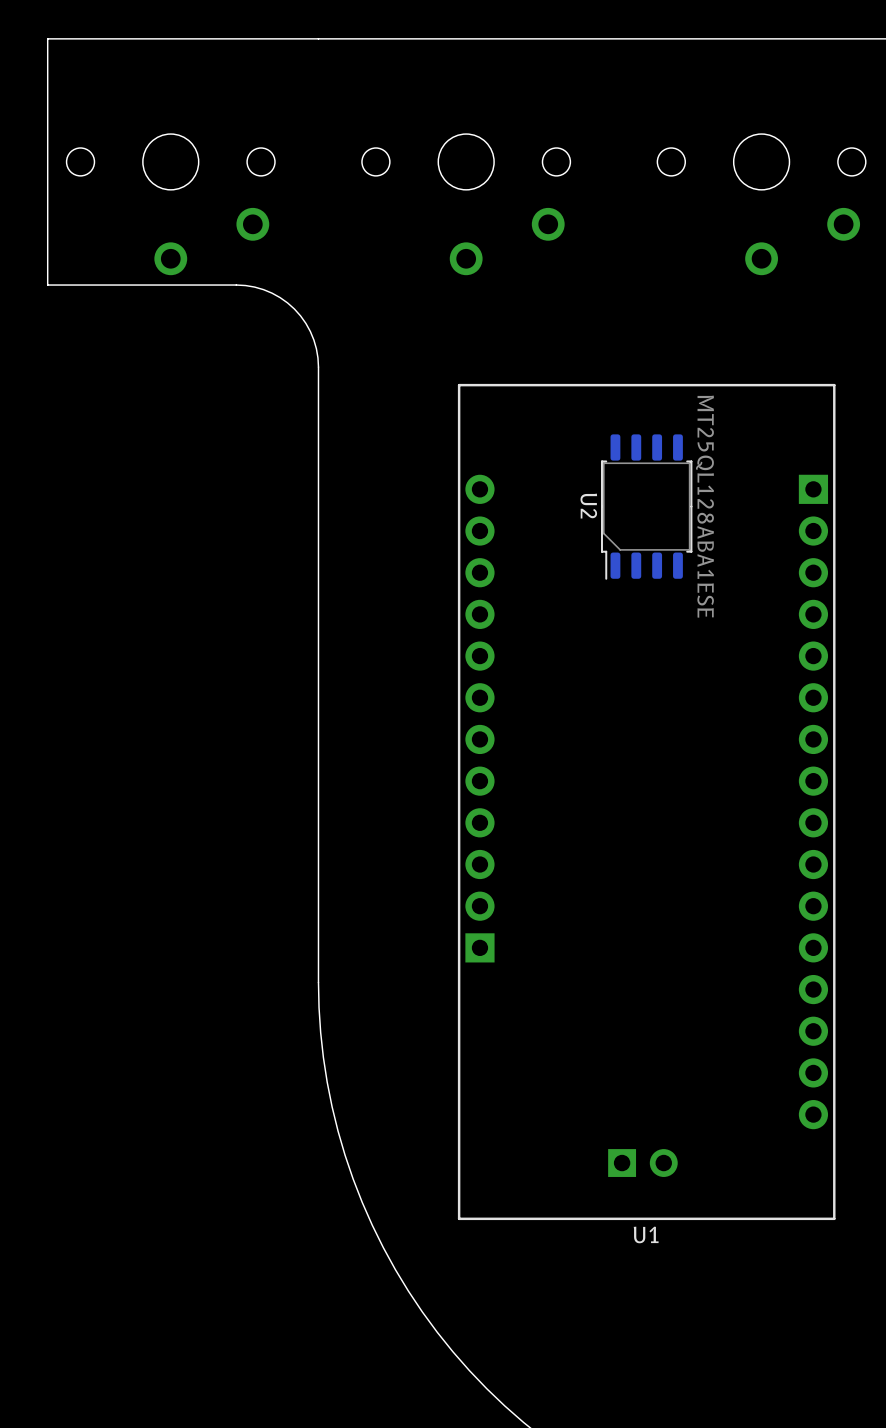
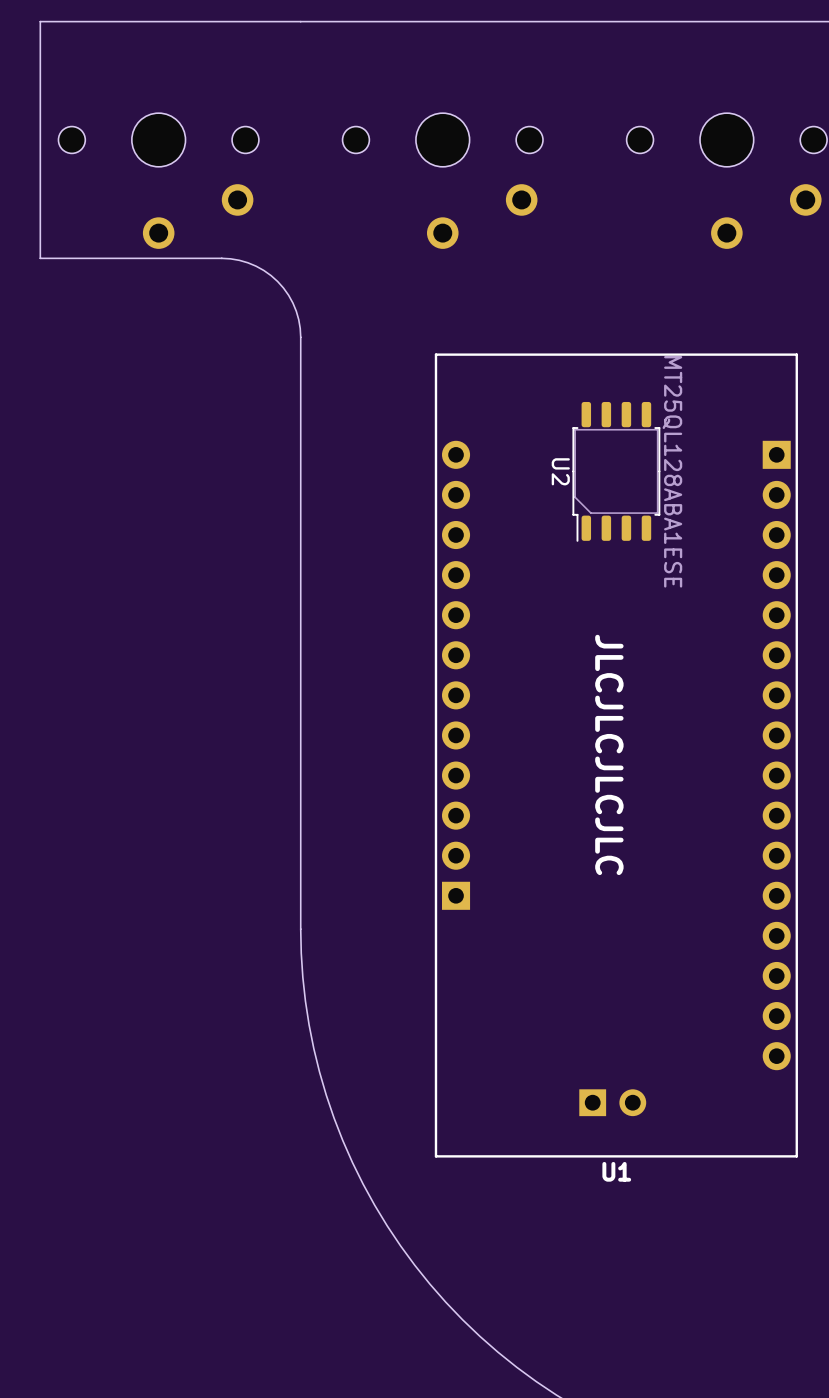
text: none -> JLCJLCJLCJLC (609, 754)

